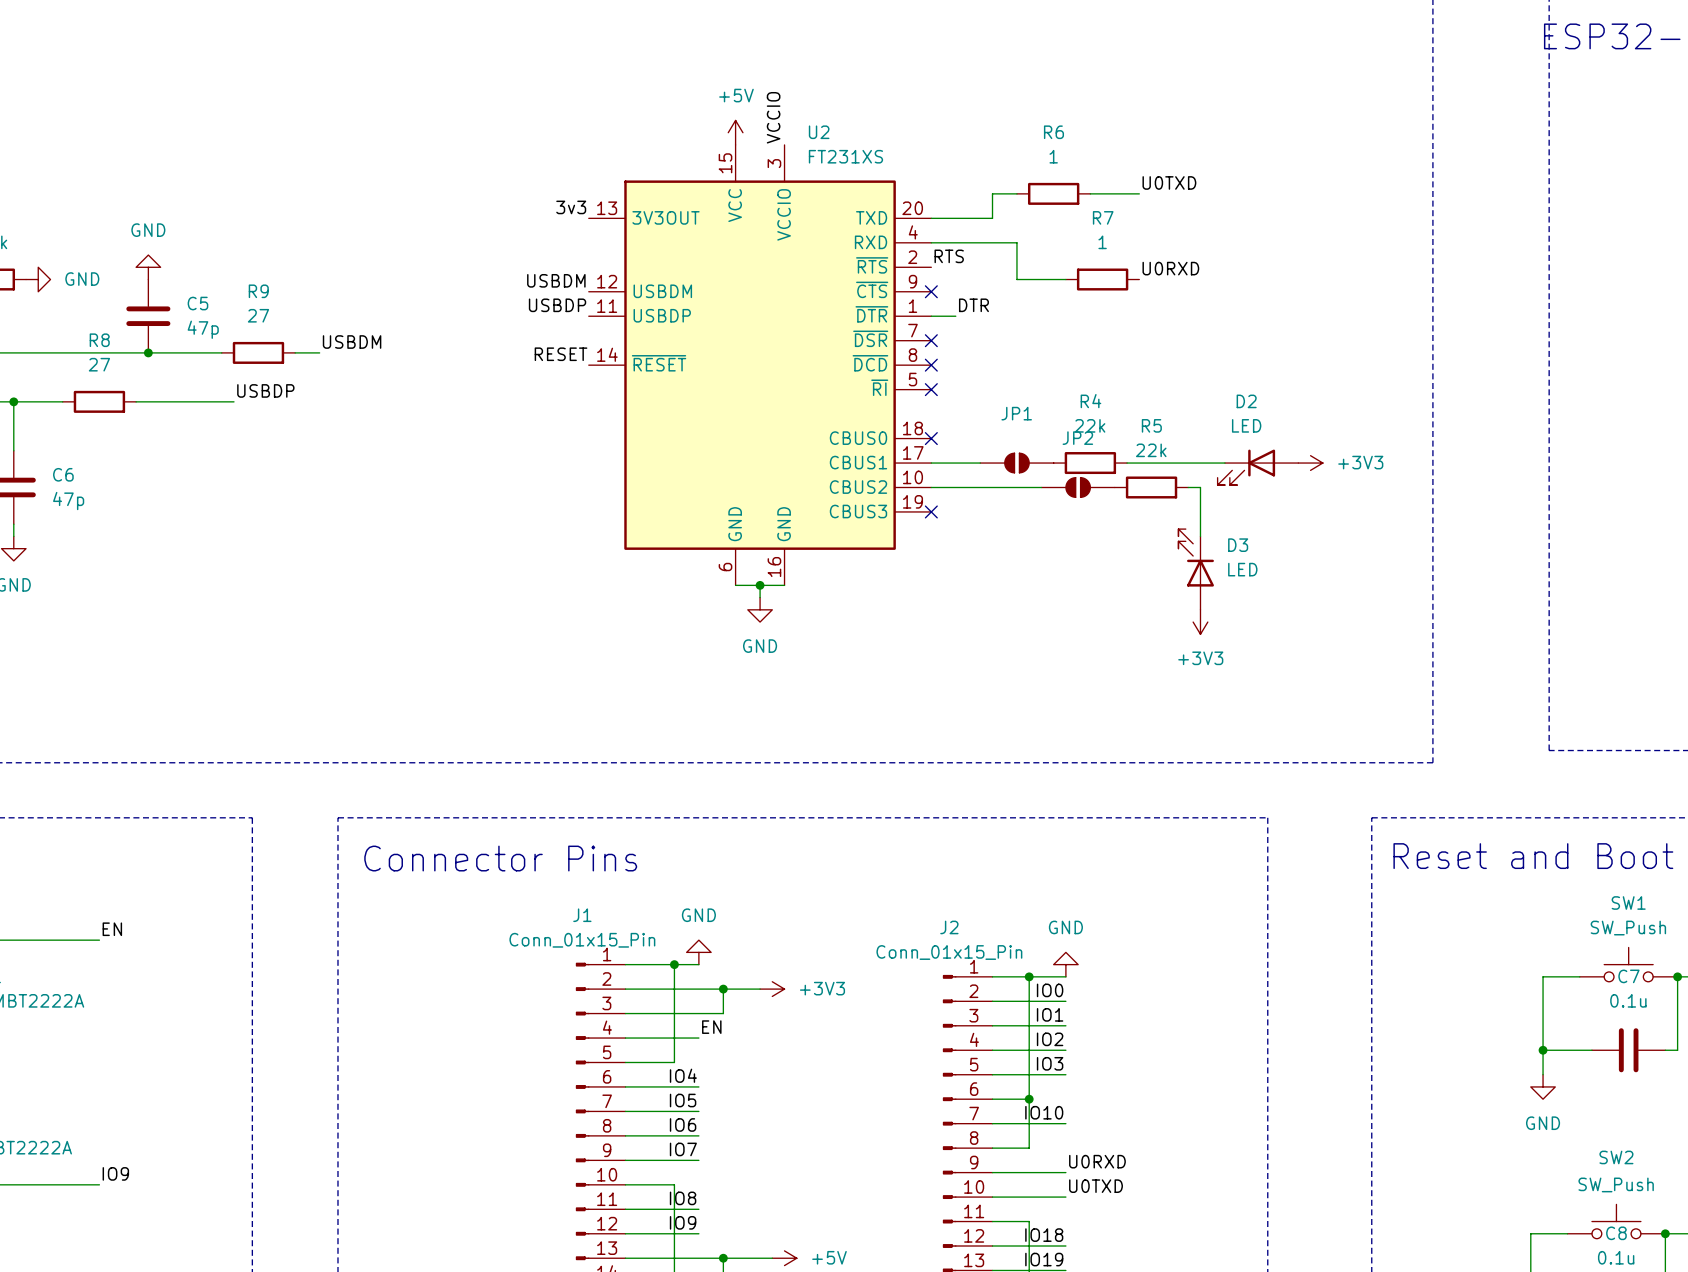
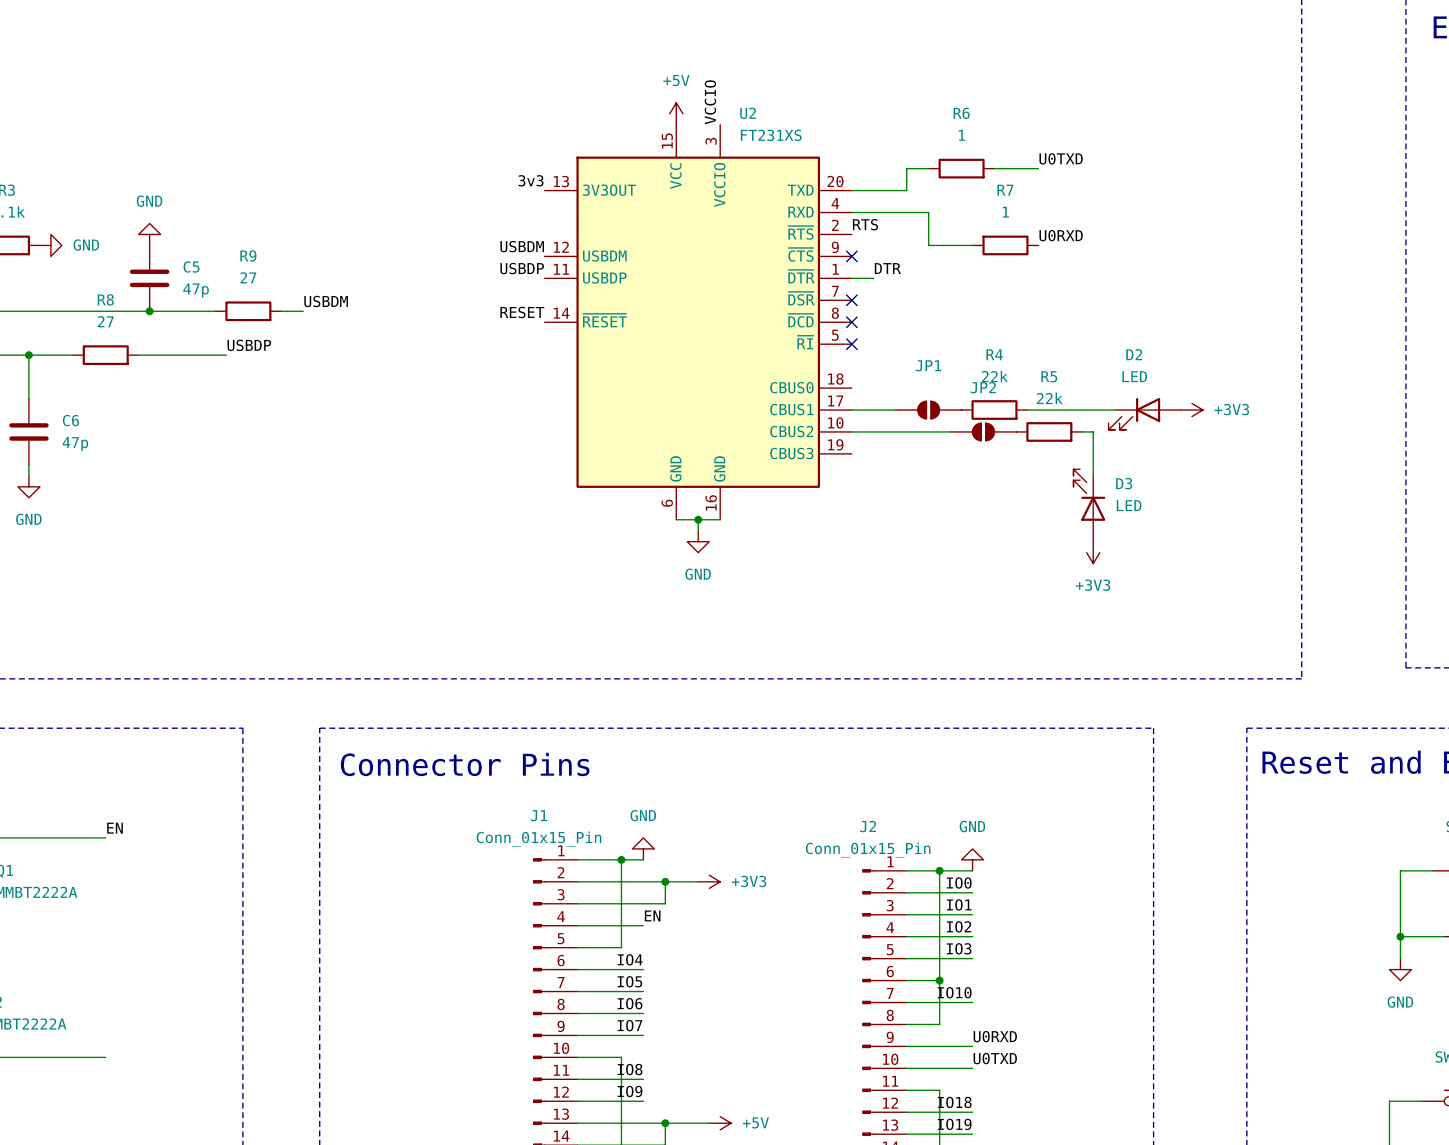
no-connect mark: (931, 438) -> none
no-connect mark: (931, 511) -> none
label: IO9 (115, 1173) -> none

